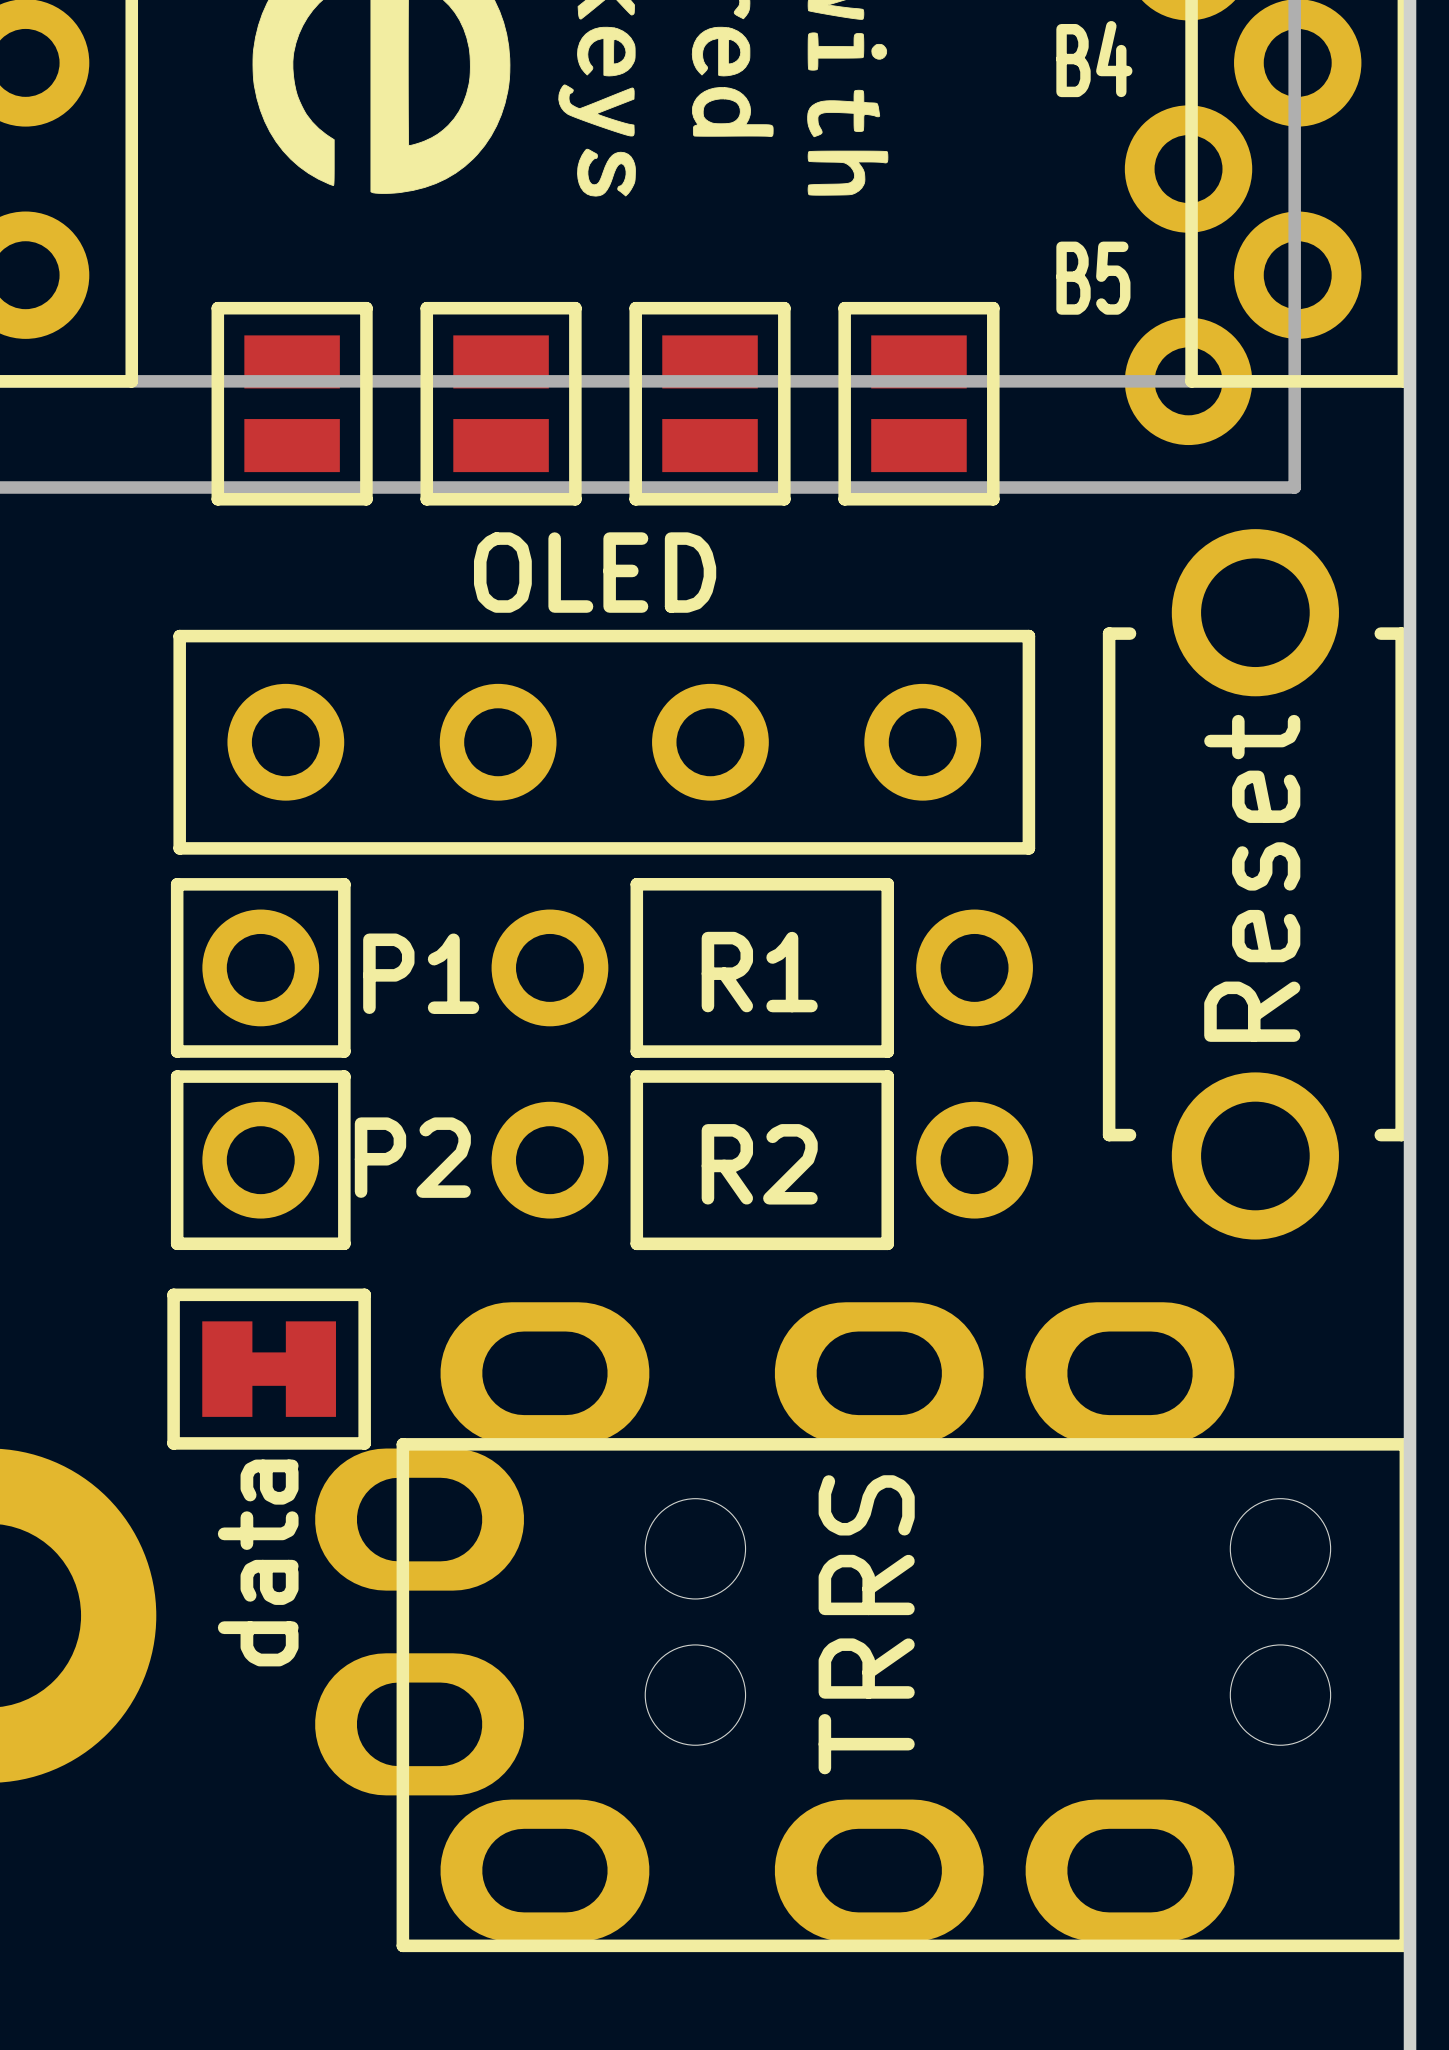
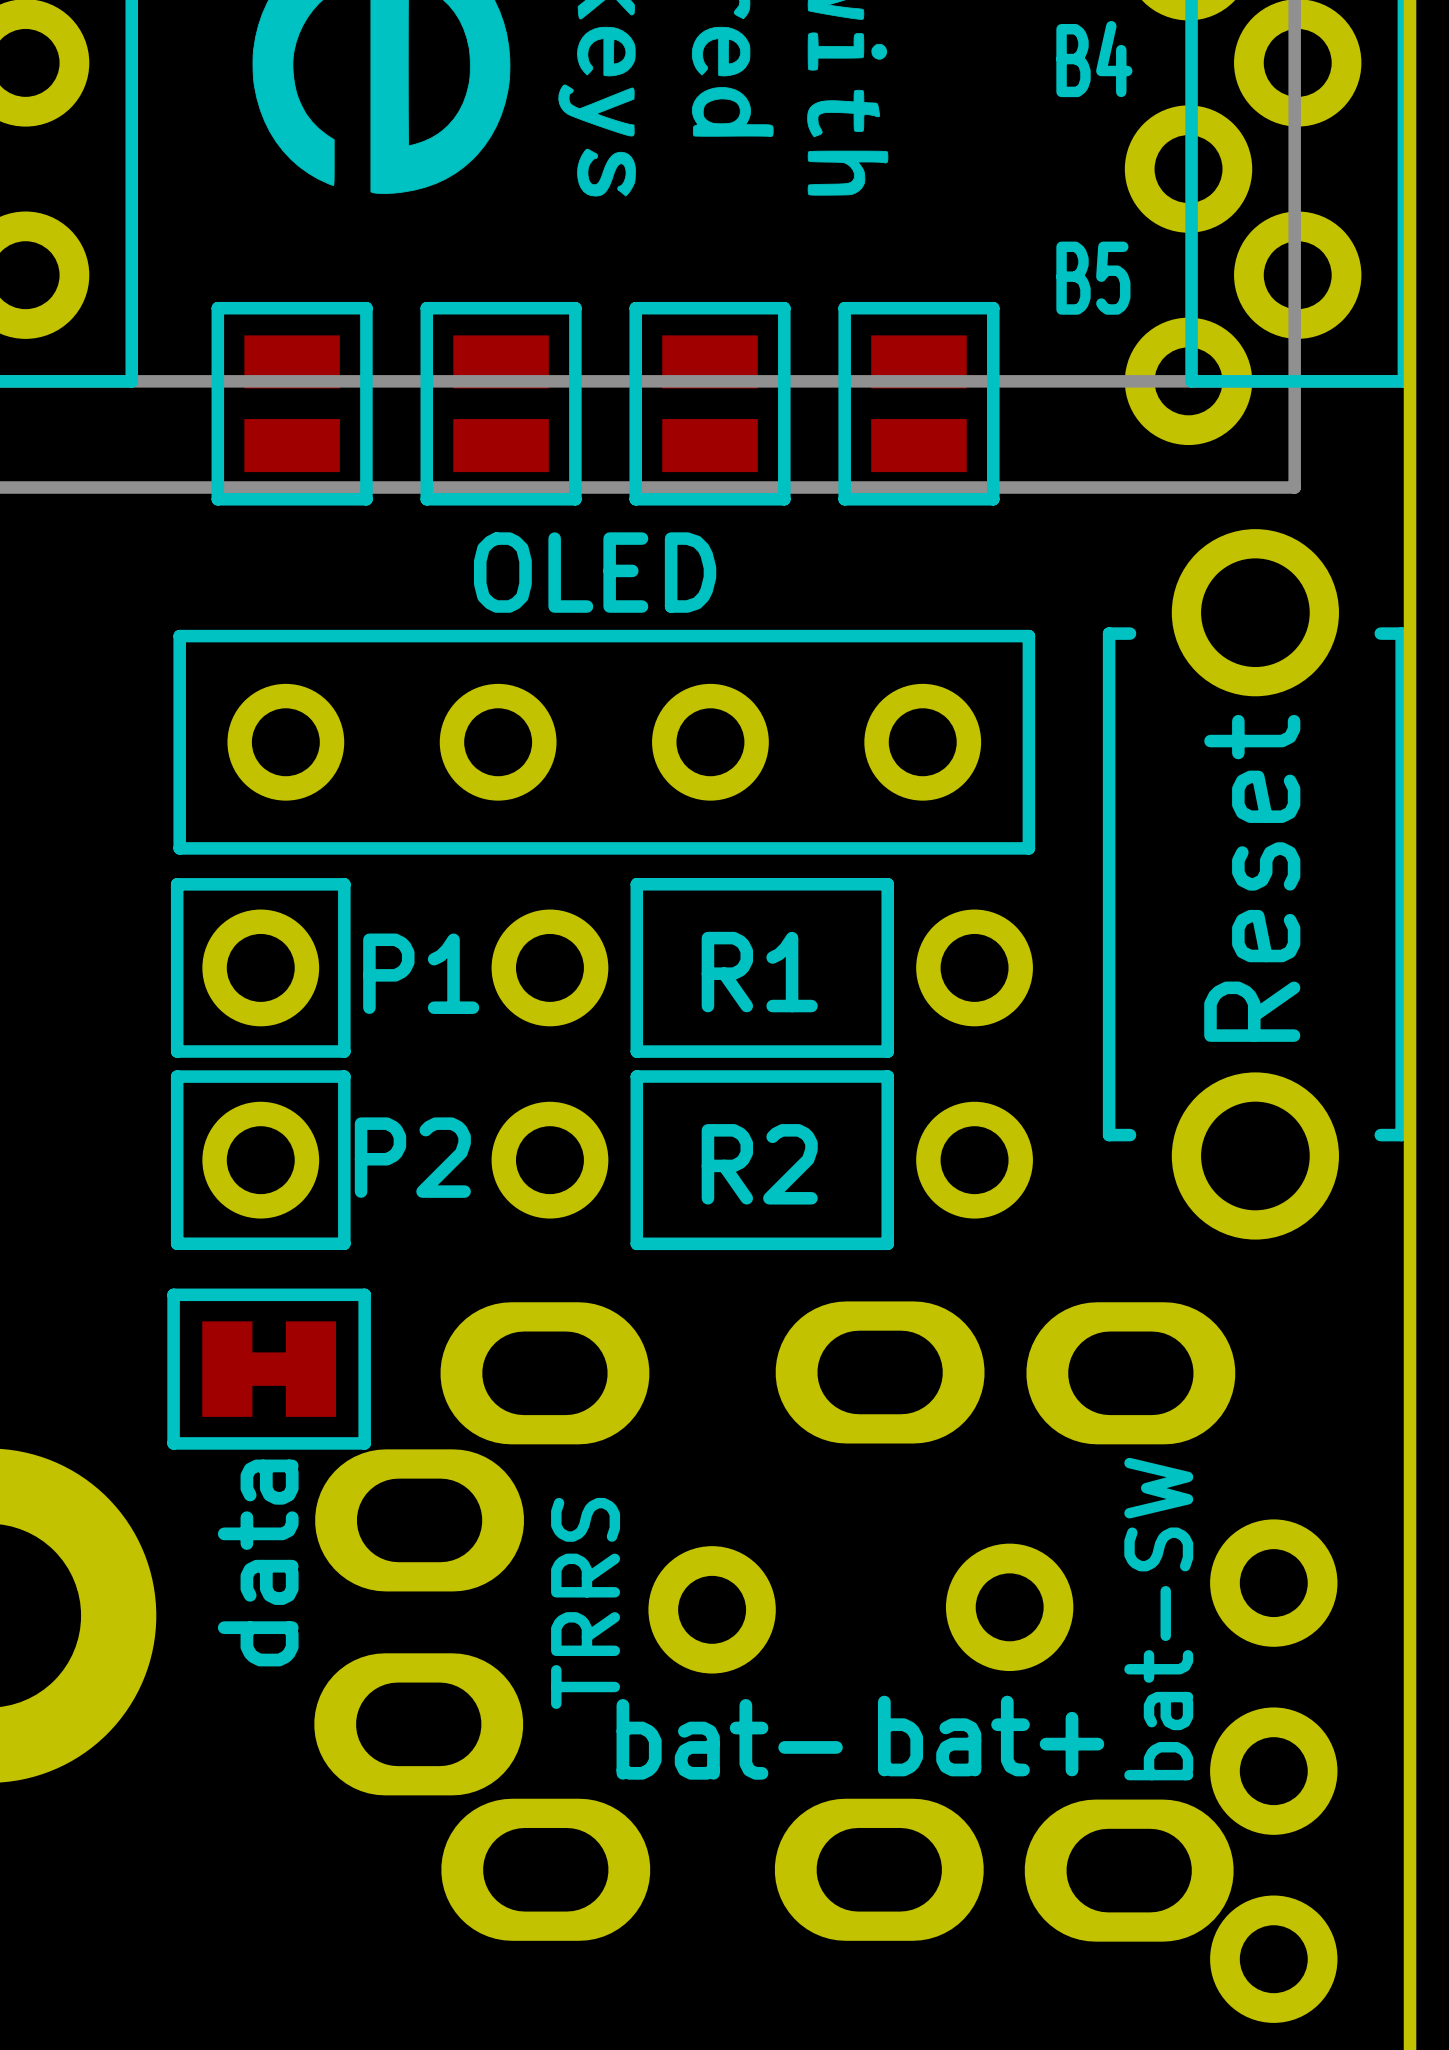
part: none -> (880, 1372)
part: none -> (544, 1373)
part: none -> (1130, 1373)
part: none -> (419, 1520)
part: none -> (1273, 1583)
text: none -> TRRS (585, 1603)
part: none -> (1009, 1607)
part: none -> (712, 1609)
text: none -> bat-SW (1158, 1619)
TRRS: (863, 1627) -> none
part: none -> (418, 1724)
text: none -> bat+ (991, 1736)
text: none -> bat- (729, 1739)
part: none -> (1273, 1771)
part: none -> (545, 1869)
part: none -> (879, 1869)
part: none -> (1129, 1870)
part: none -> (1273, 1959)

